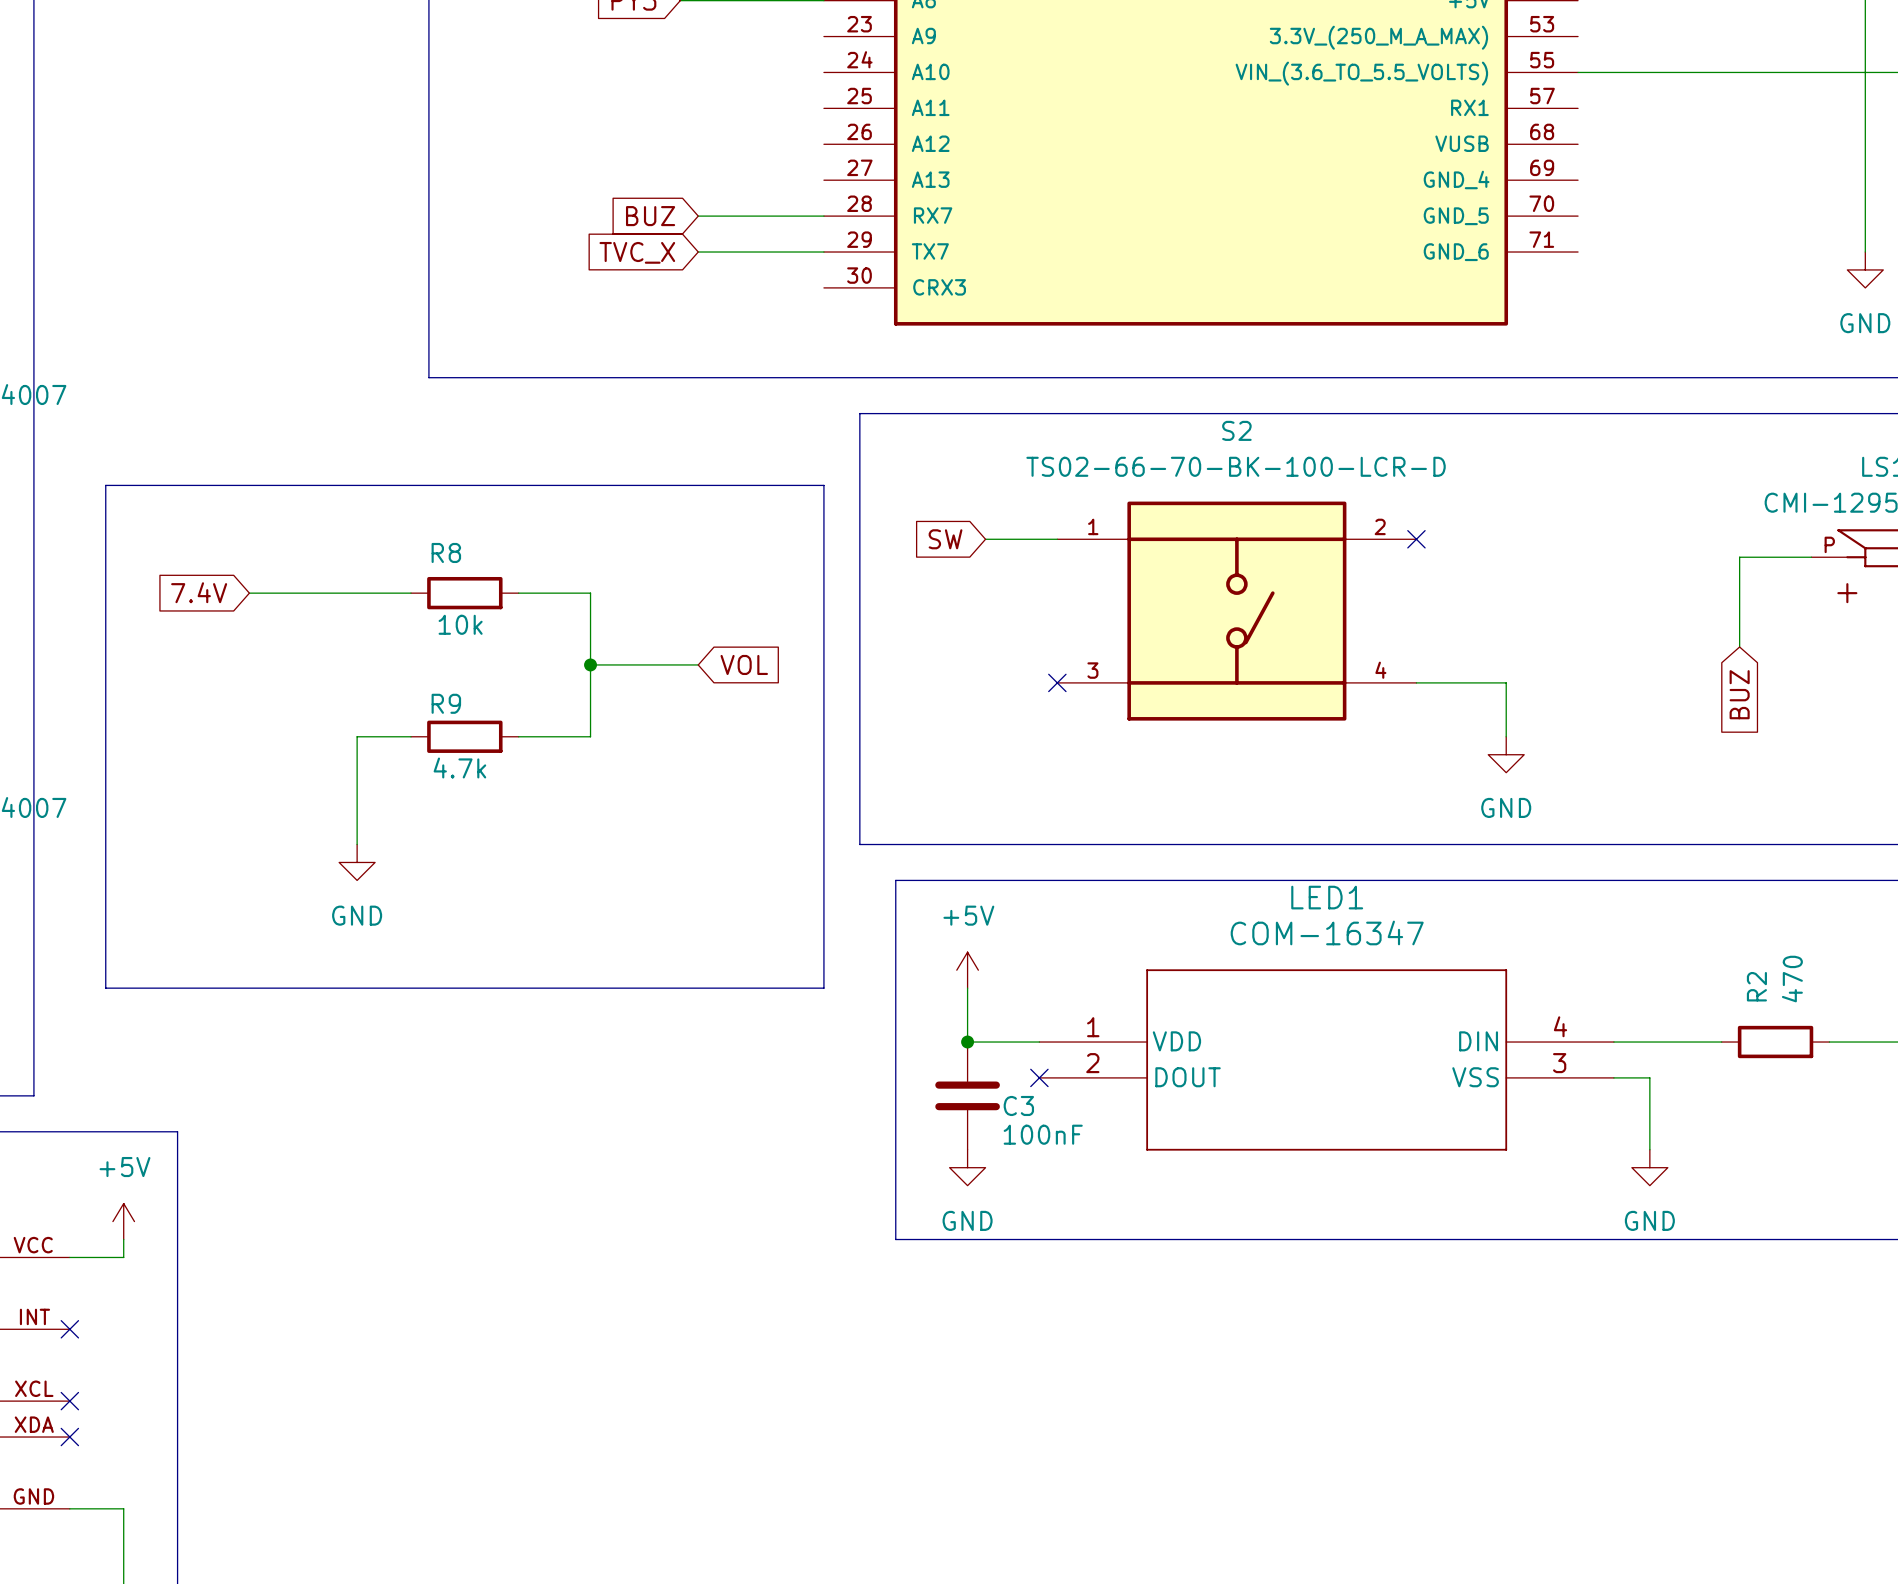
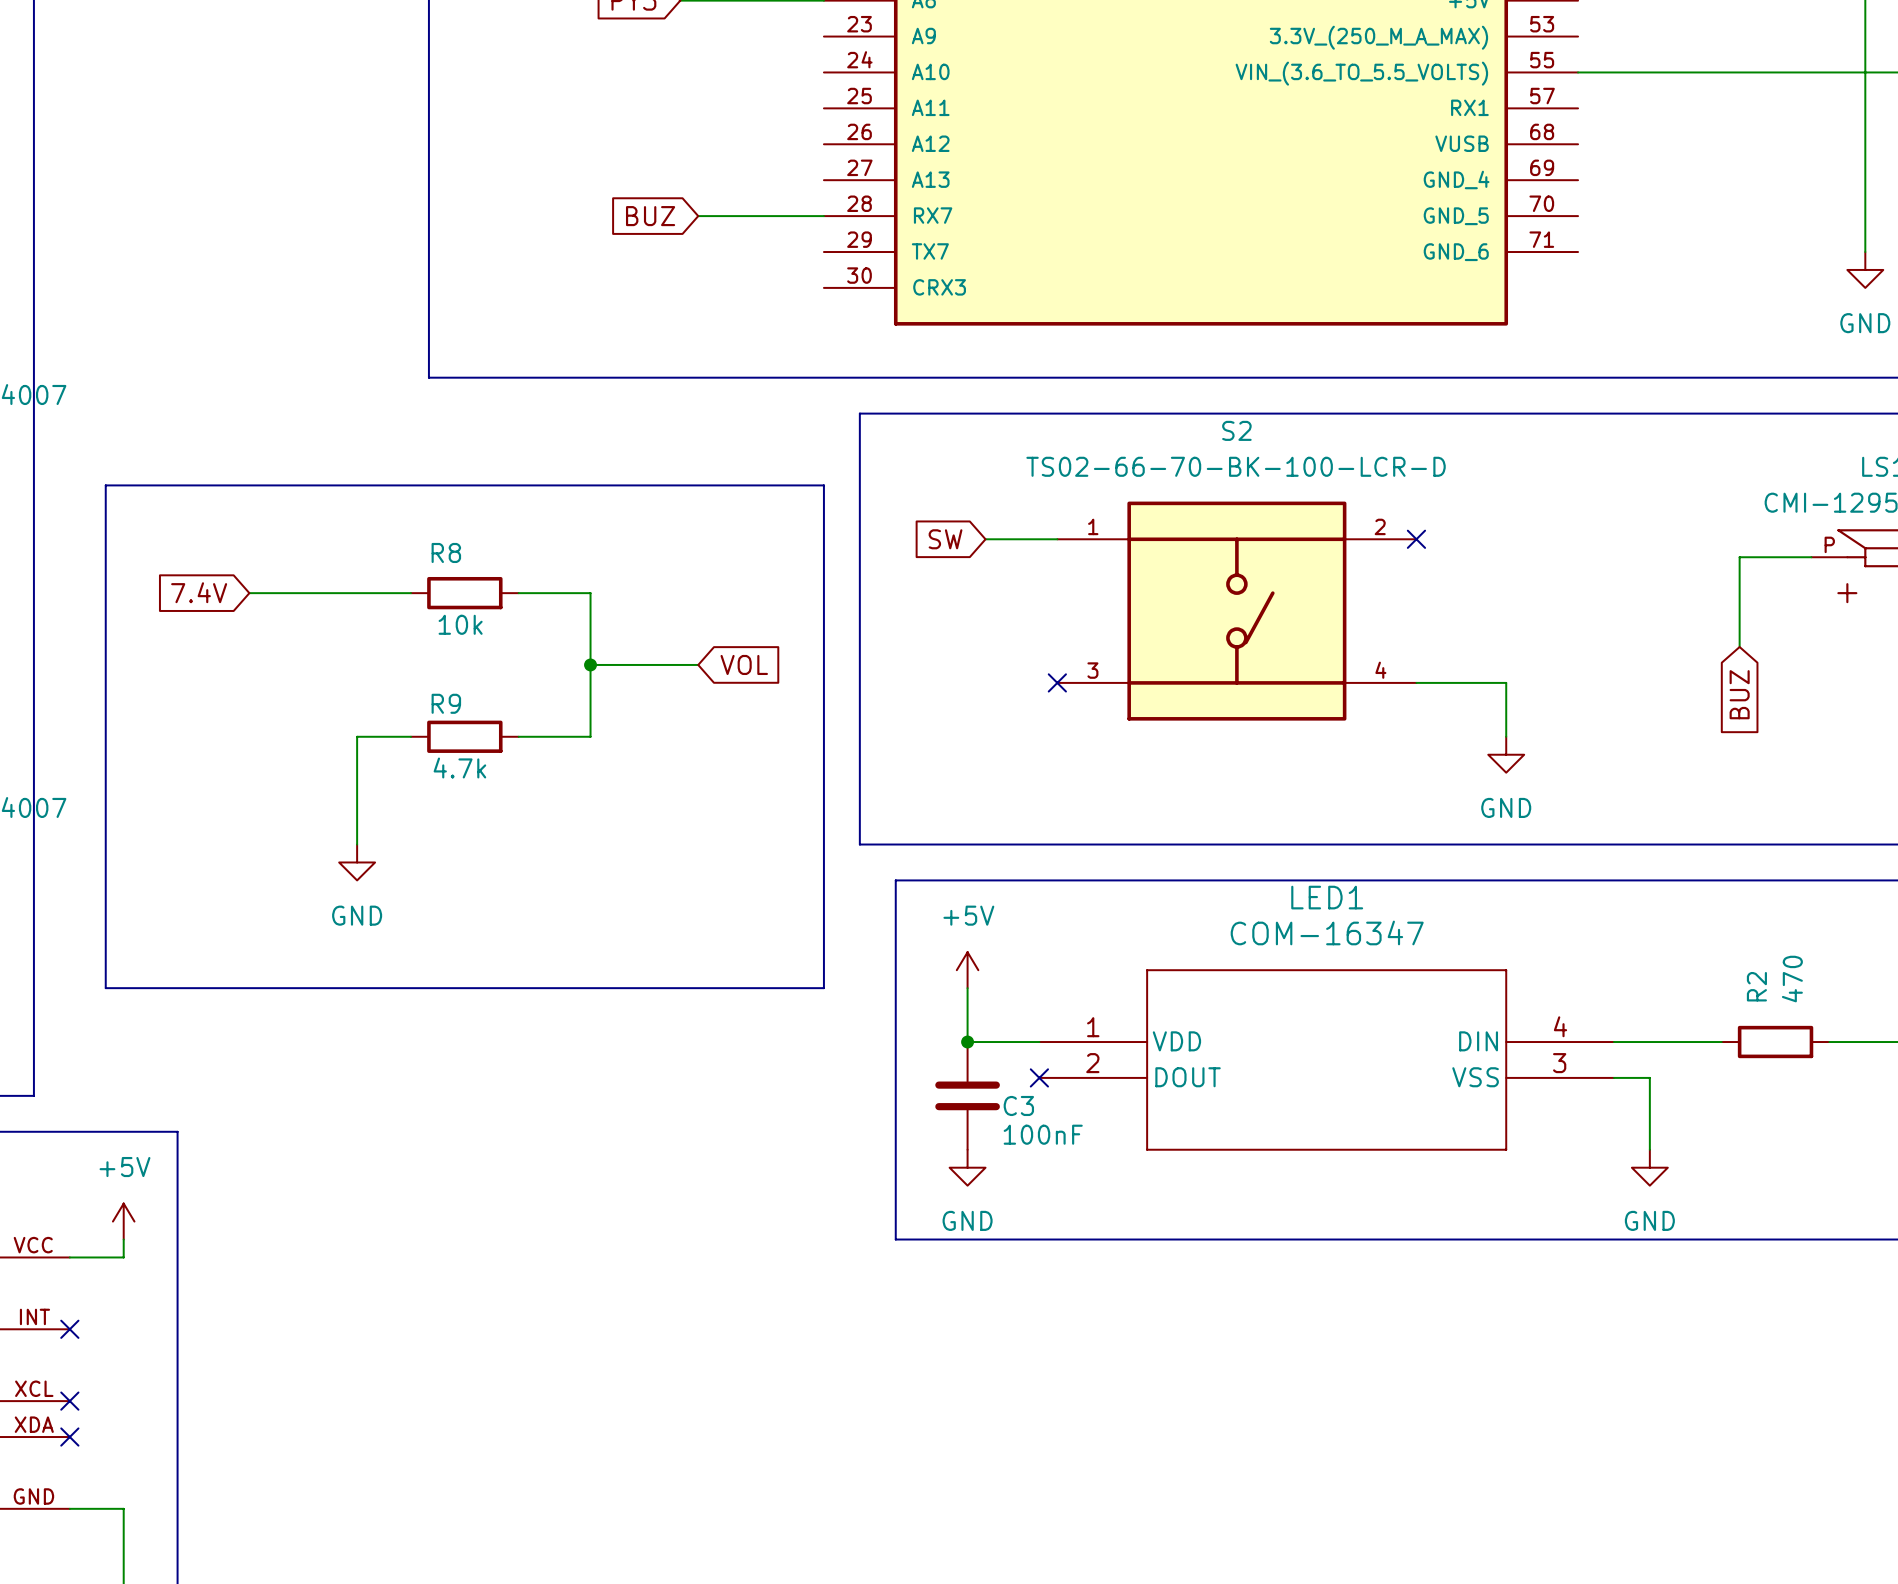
global label: TVC_X (637, 252) -> none
wire: (698, 252) (823, 252) -> none

